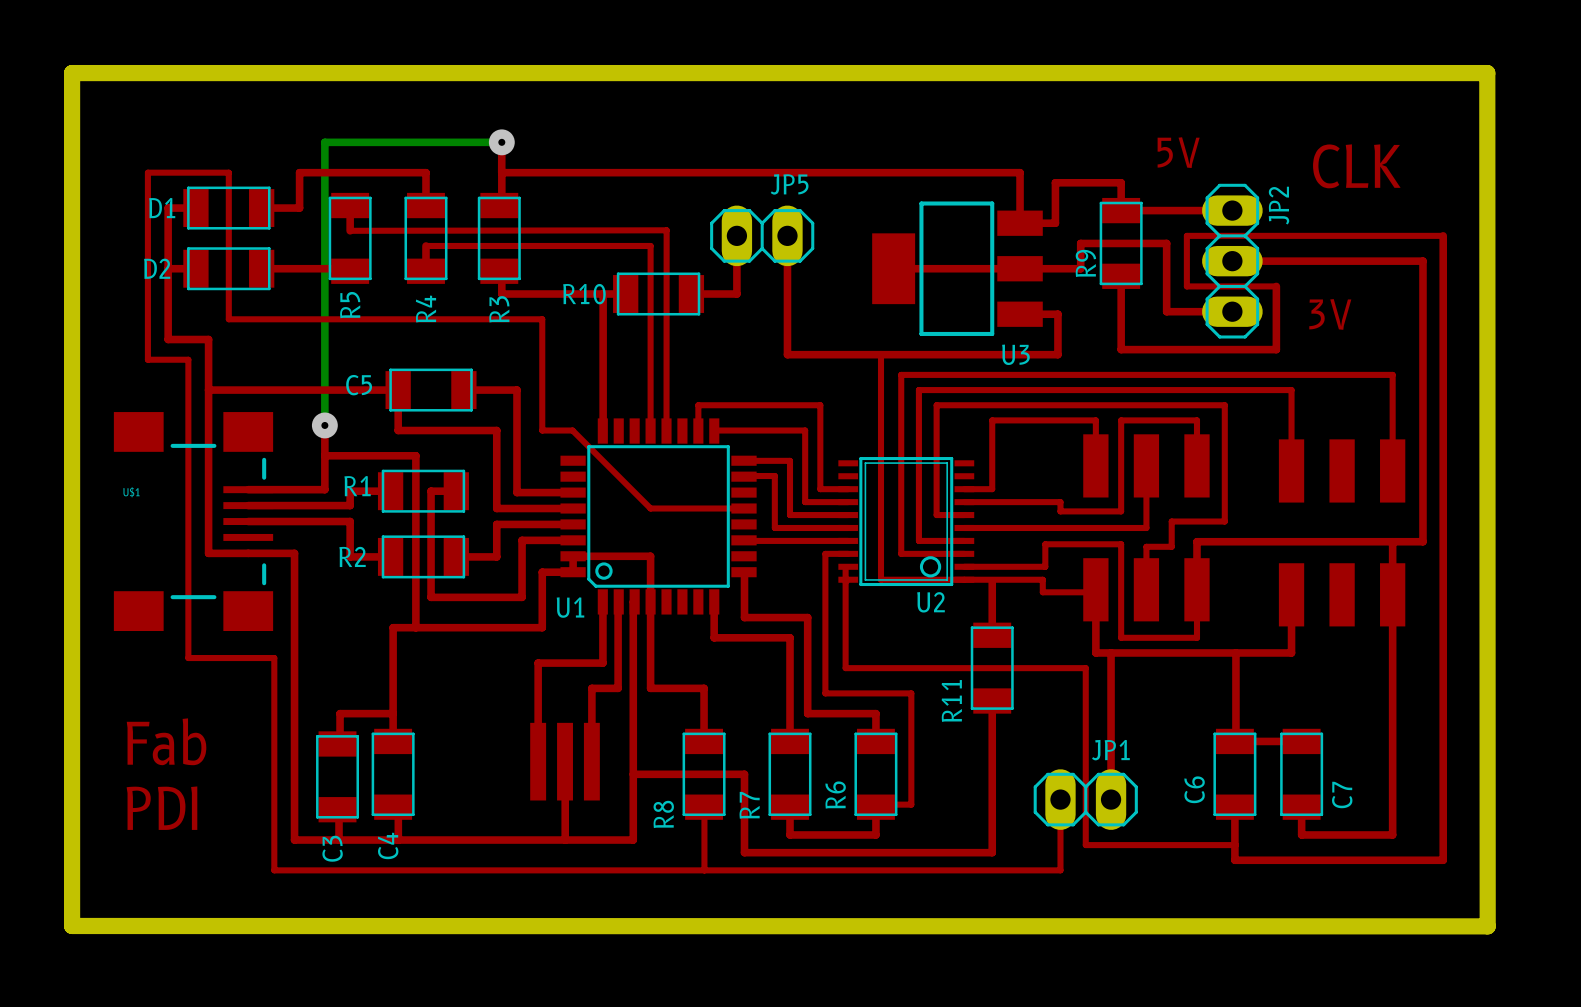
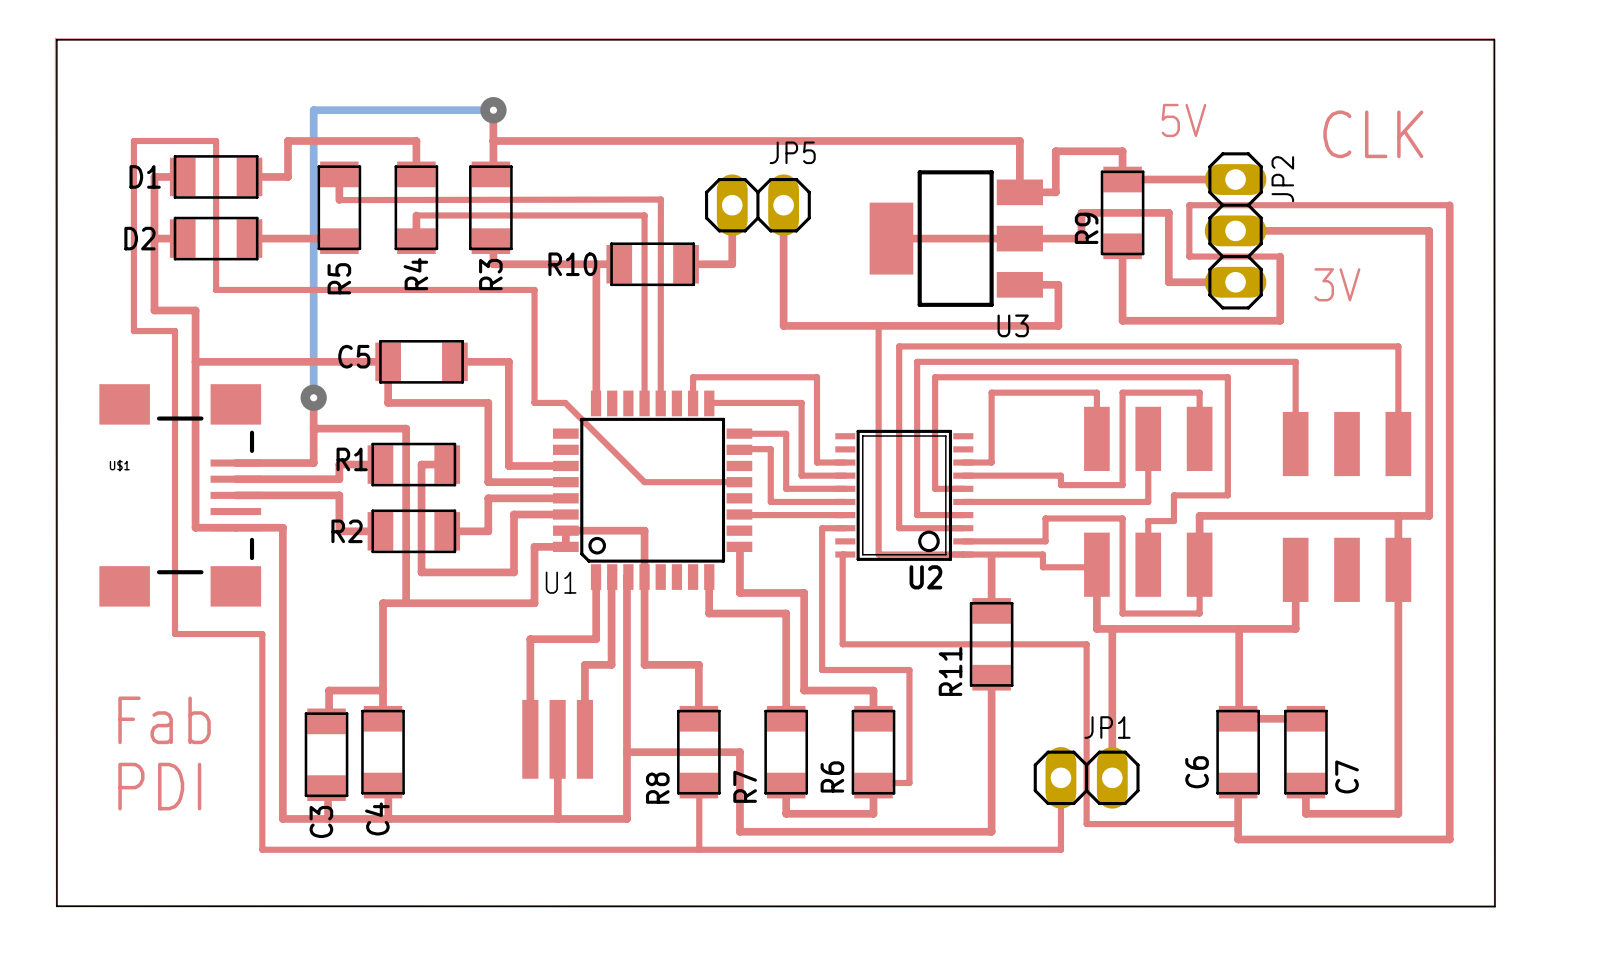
board edge width: thick (72, 73) (1487, 73) (1487, 926) (72, 925) (72, 73) -> thin (56, 39) (1494, 39) (1494, 906) (56, 906) (56, 39)
top track: (845, 567) (845, 579) -> none

